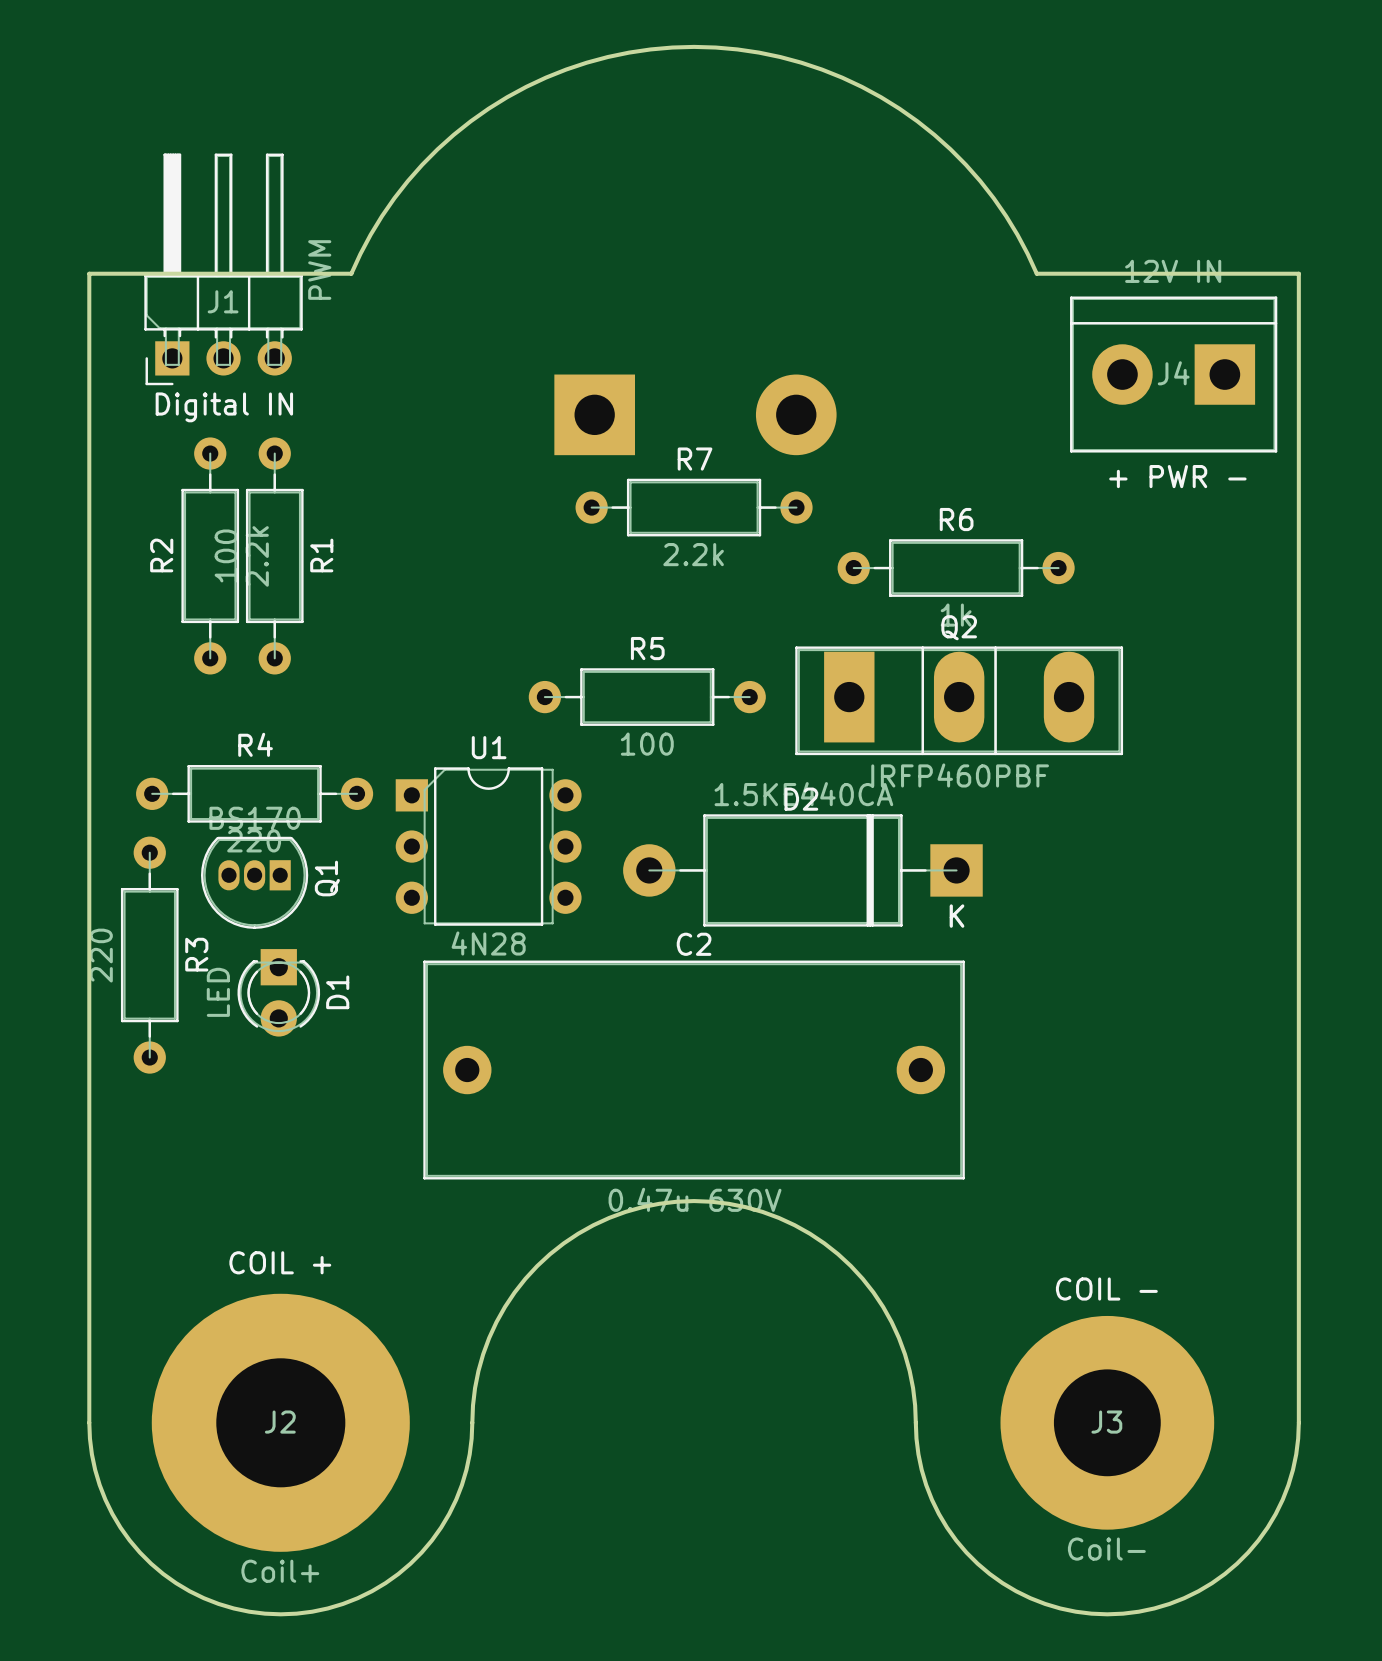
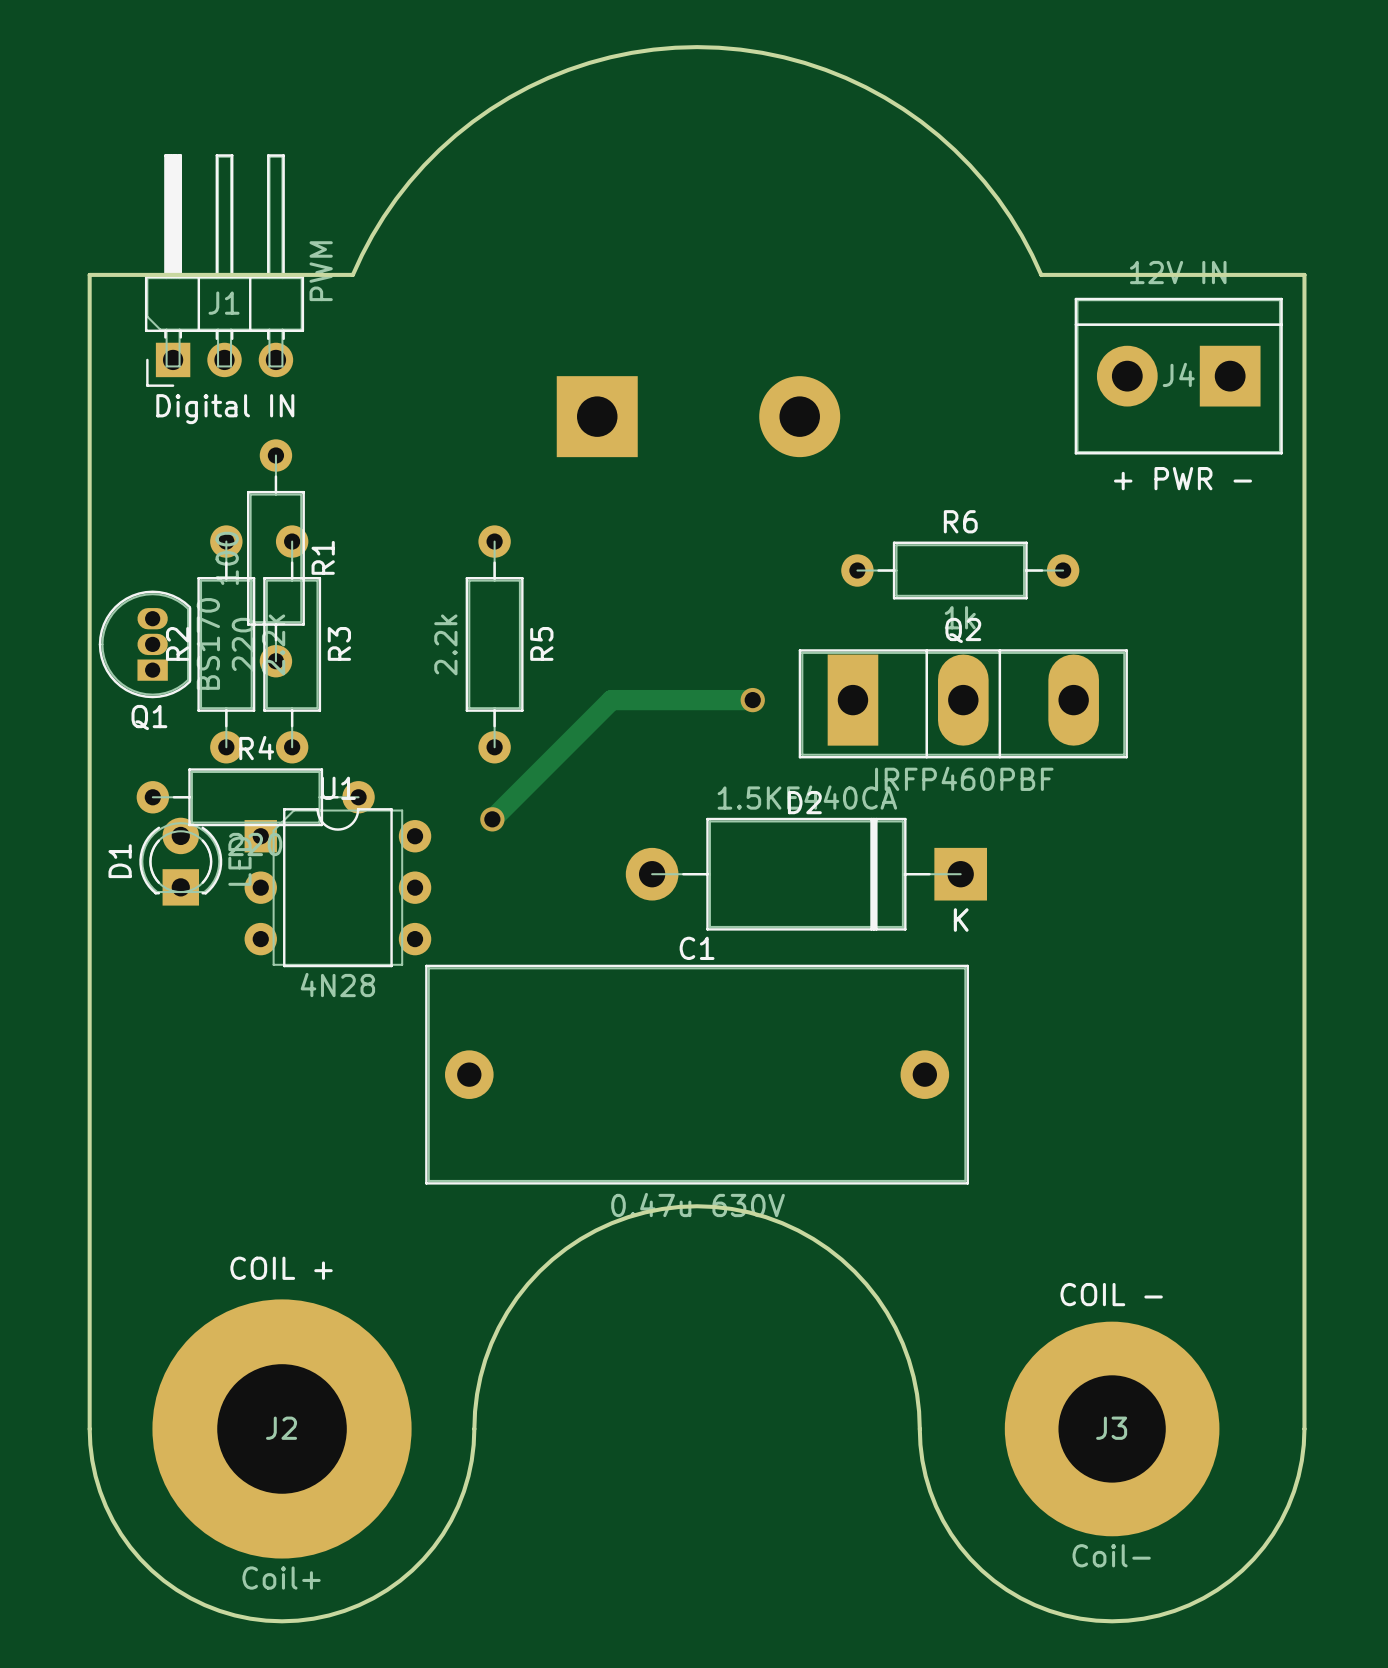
R7: 2.2k (694, 507) -> none
R2 position: (210, 555) -> (226, 644)
R5 rotation: 0° (647, 697) -> 90° clockwise (494, 644)
R5 position: (647, 697) -> (494, 644)
track: none -> (752, 700) (611, 700) (492, 819)
via: none -> (752, 700)
R5 value: 100 (647, 744) -> 2.2k (445, 644)
via: none -> (492, 819)
U1 position: (488, 846) -> (337, 887)
Q1 rotation: 0° (254, 882) -> 90° clockwise (145, 644)
Q1 position: (254, 882) -> (145, 644)
C2 name: C2 (694, 944) -> C1 (697, 948)
R3 position: (149, 955) -> (292, 644)
D1 rotation: 0° (278, 992) -> 180° (180, 861)
D1 position: (278, 992) -> (180, 861)

